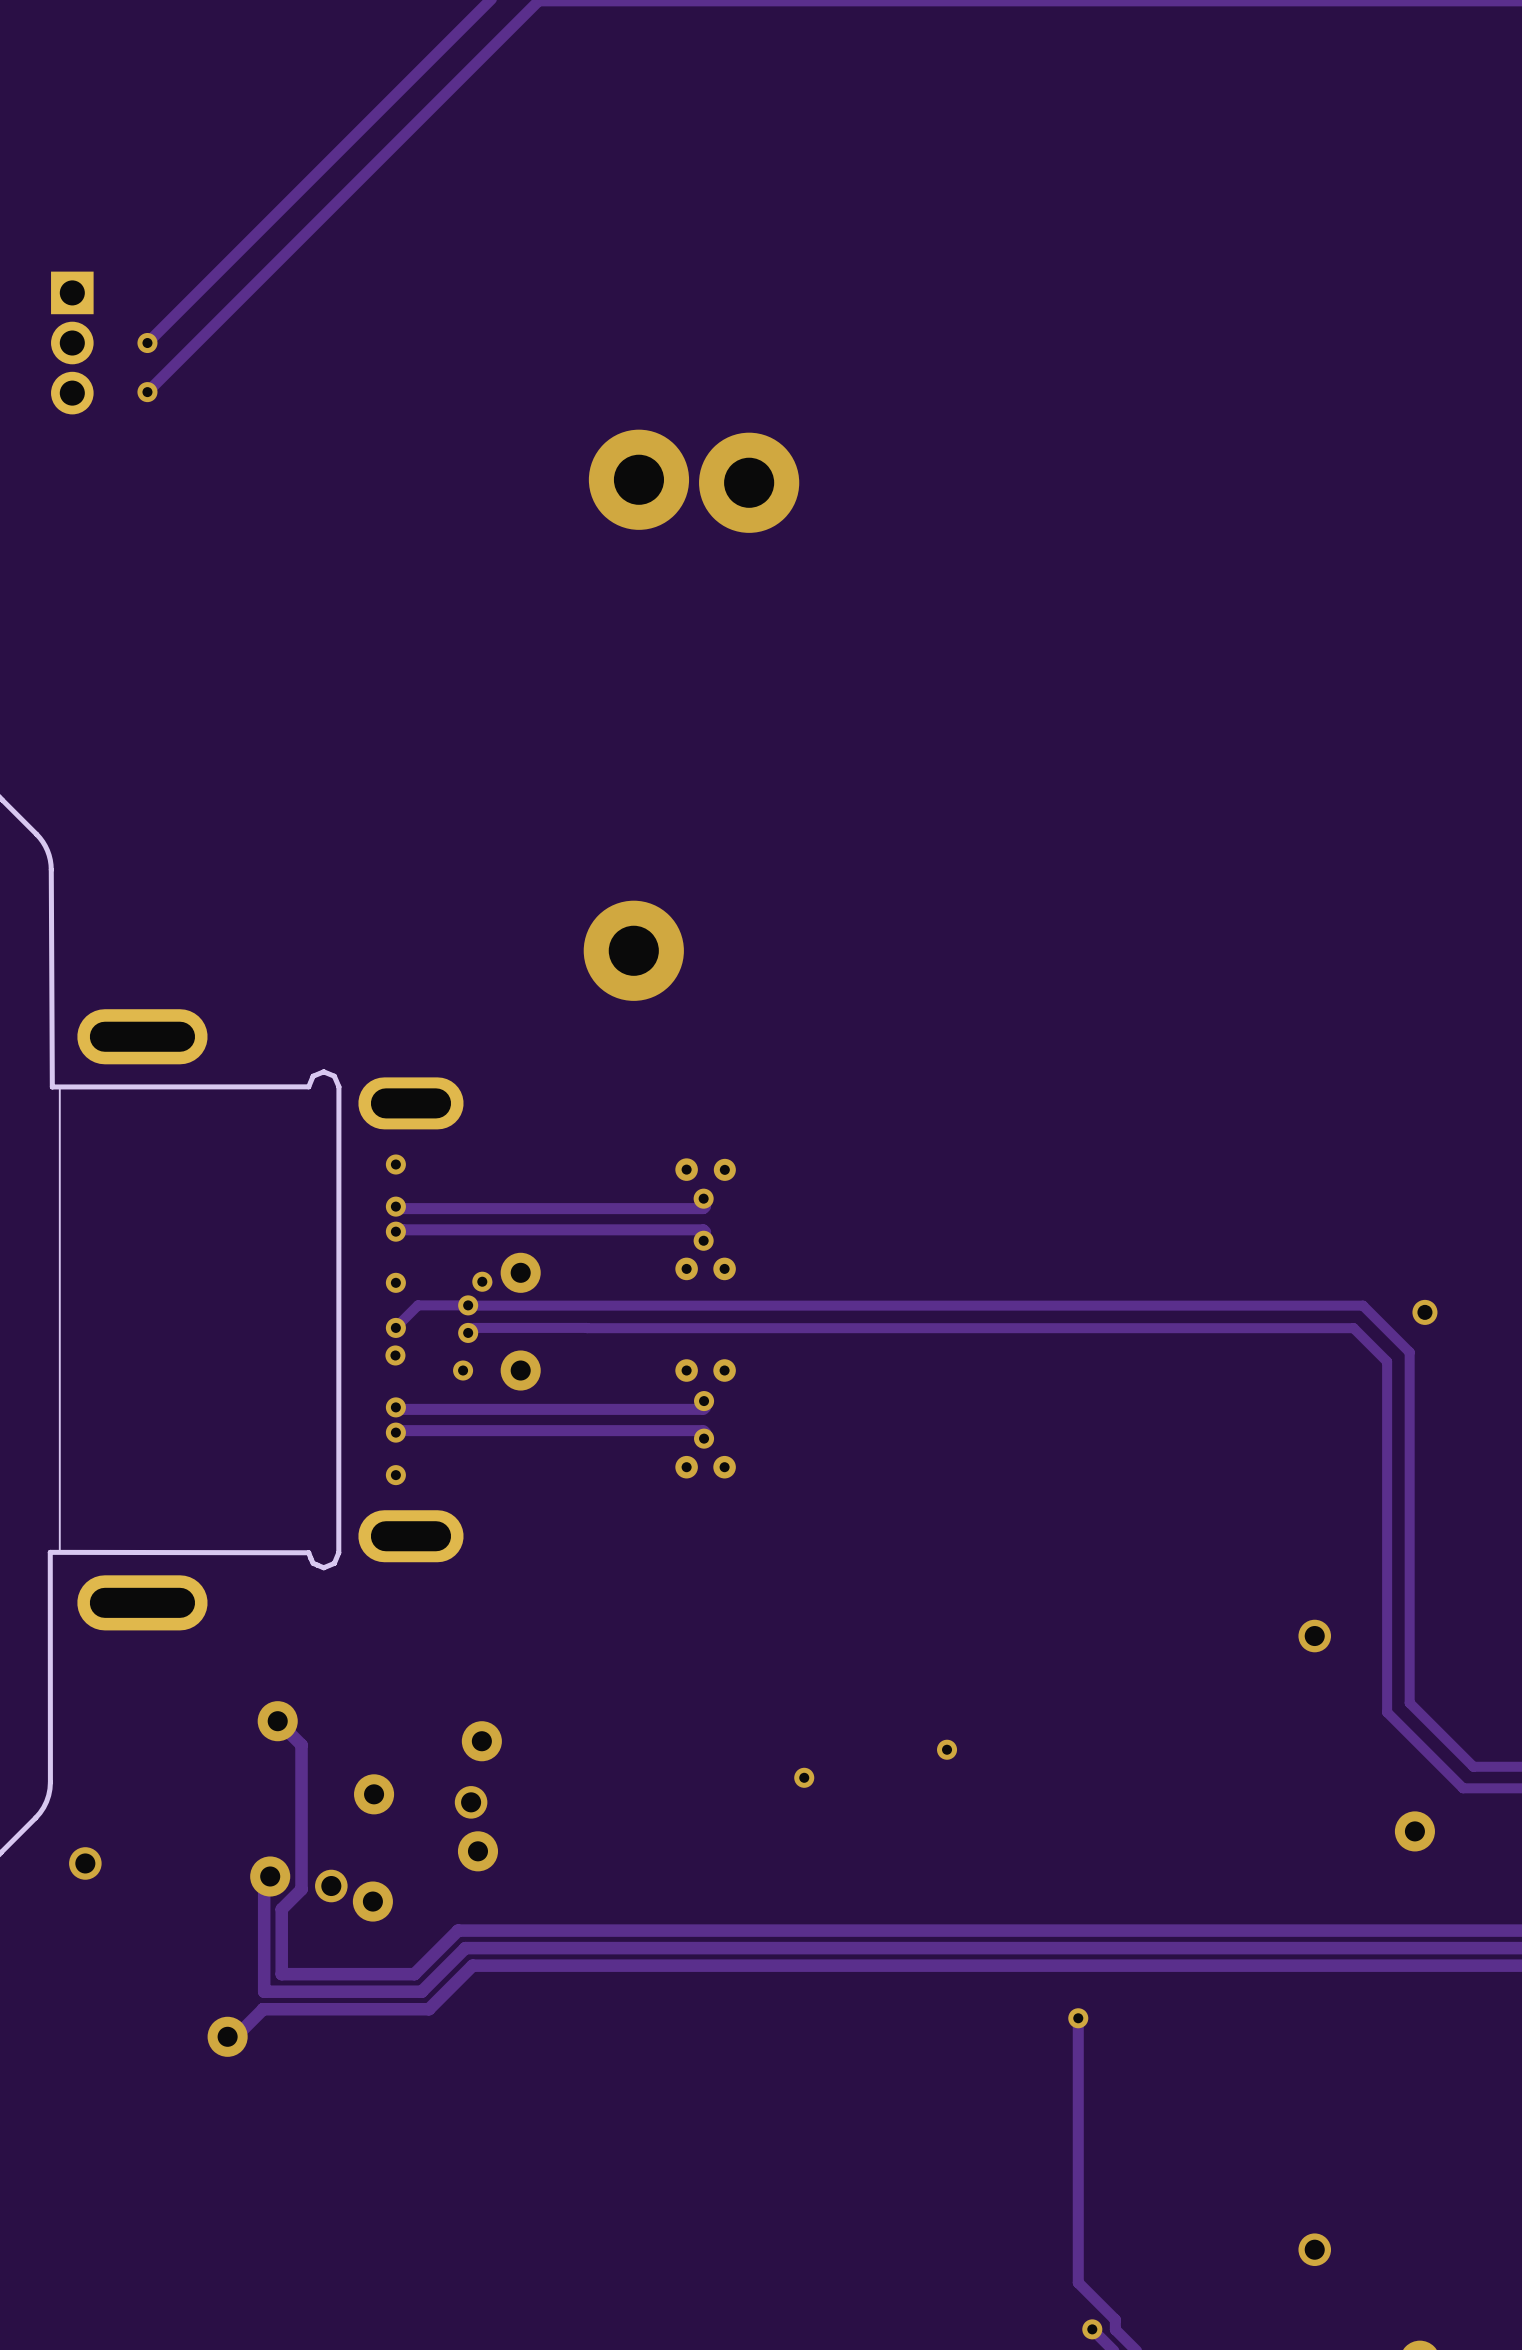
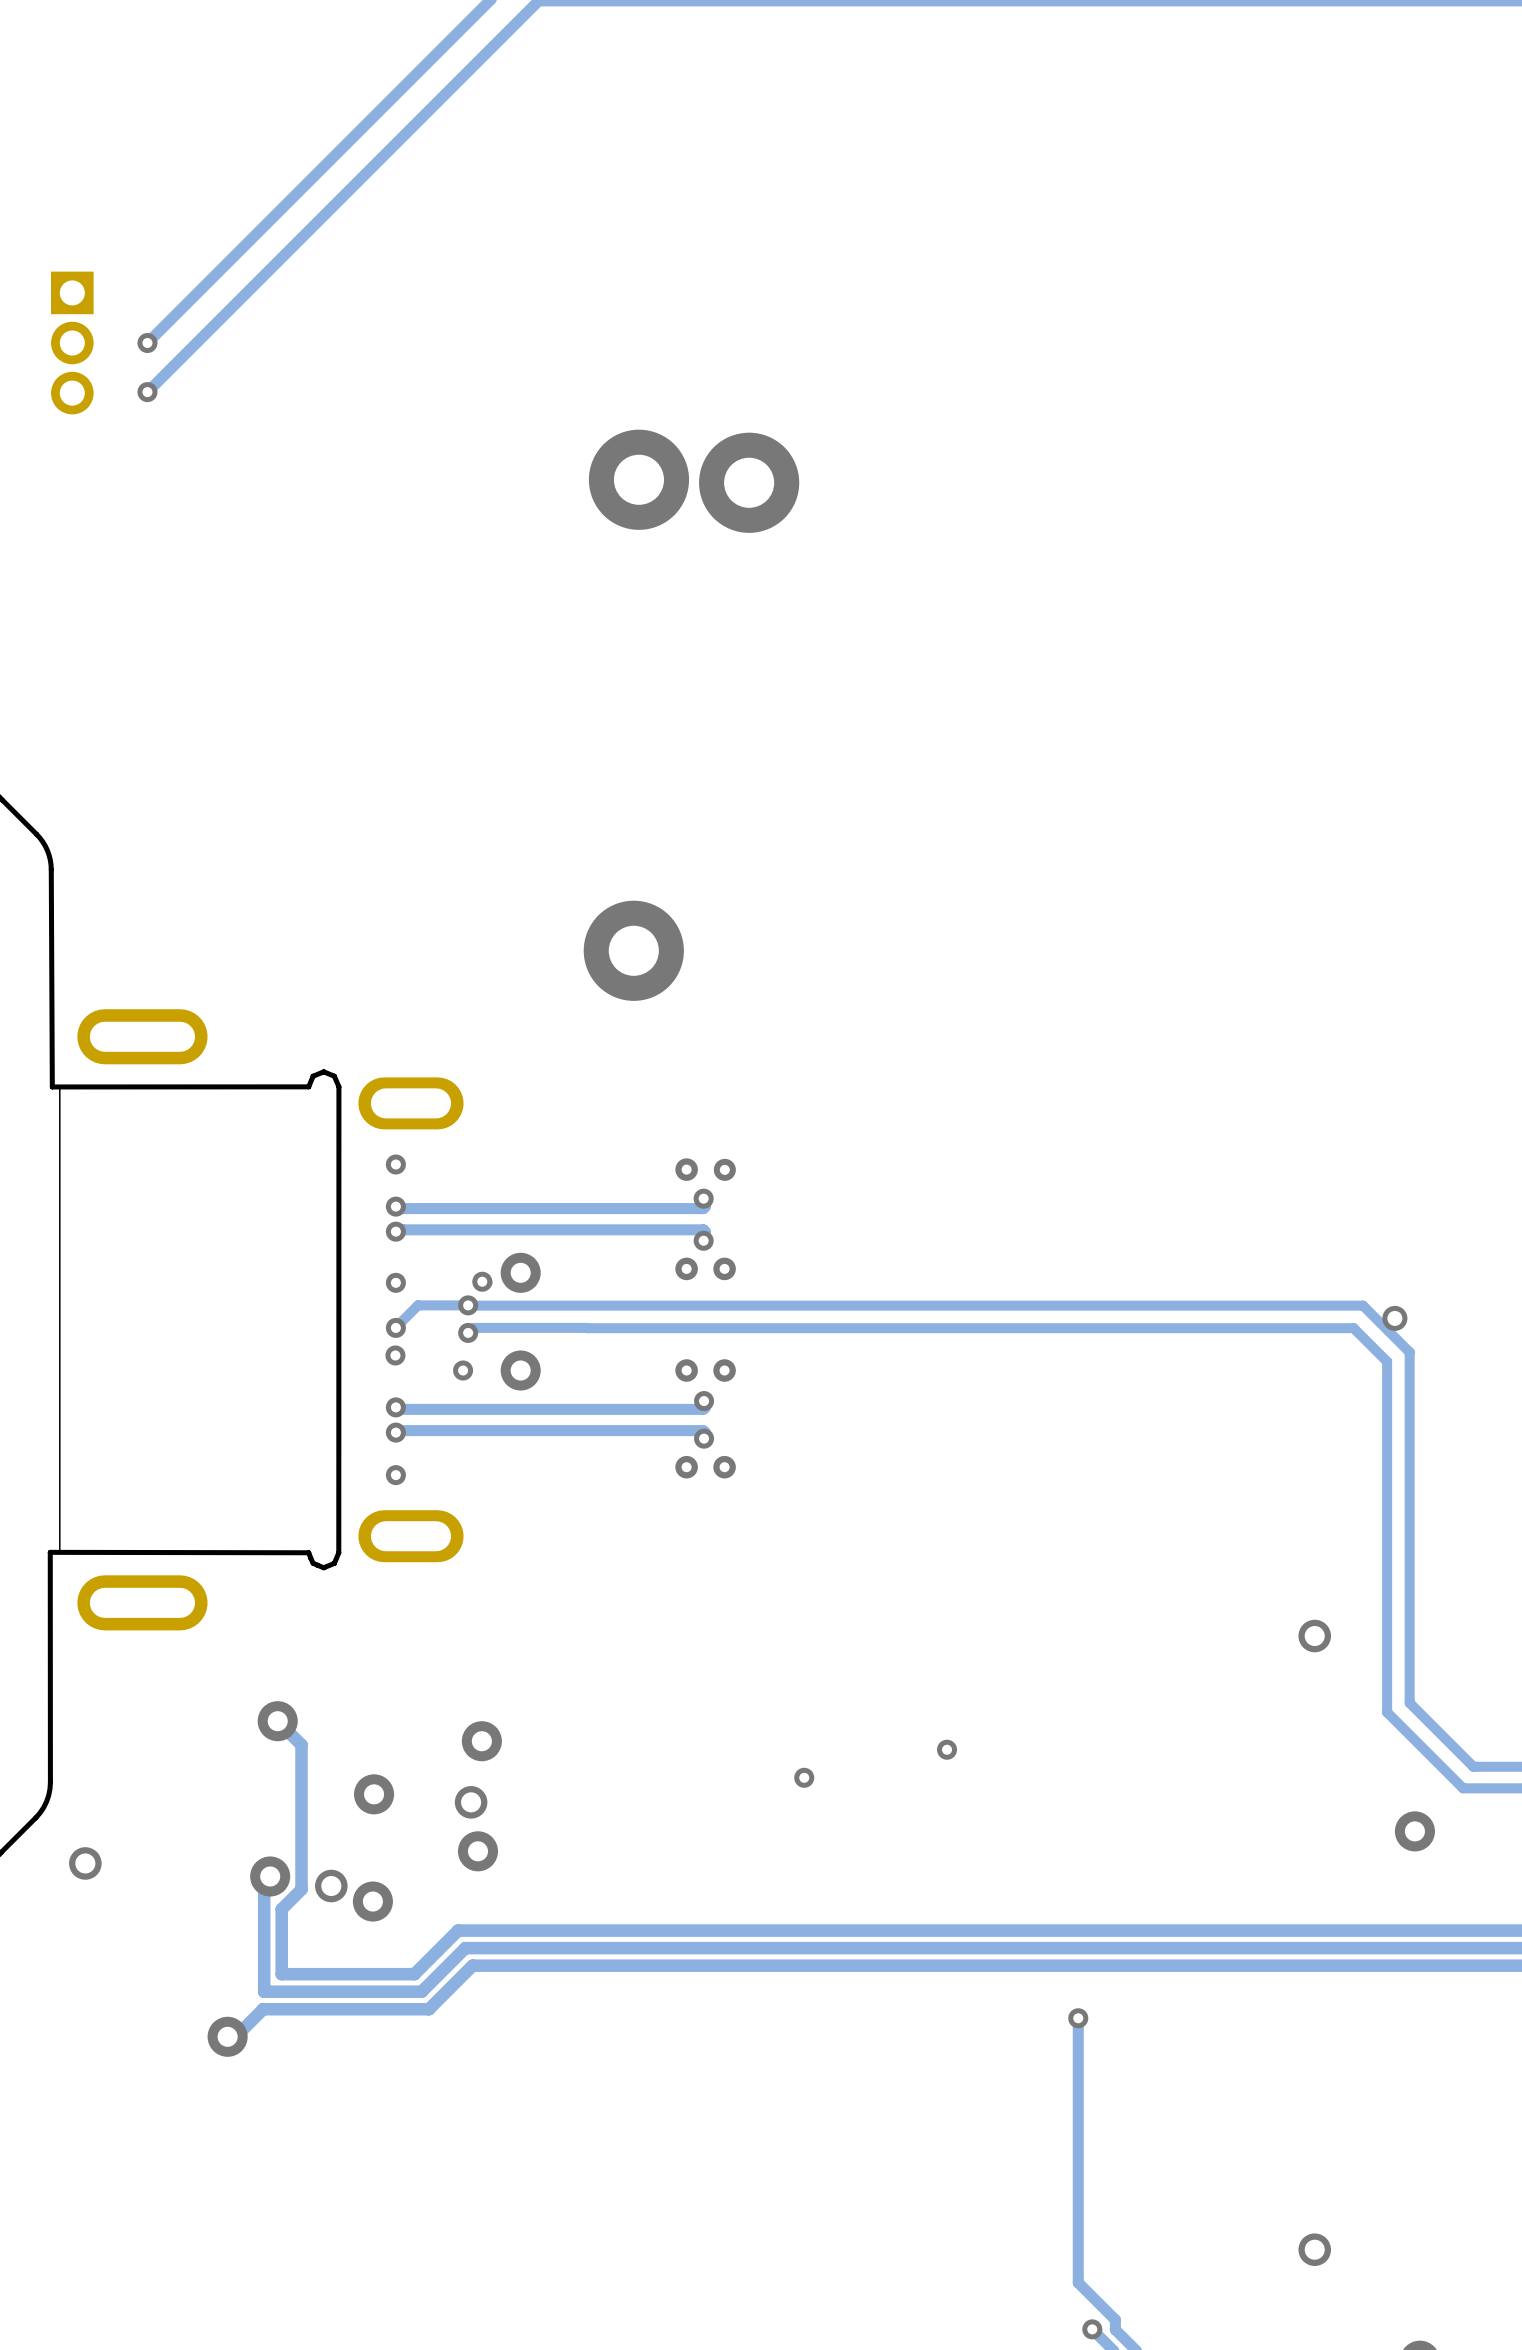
via position: (1424, 1312) -> (1394, 1318)

